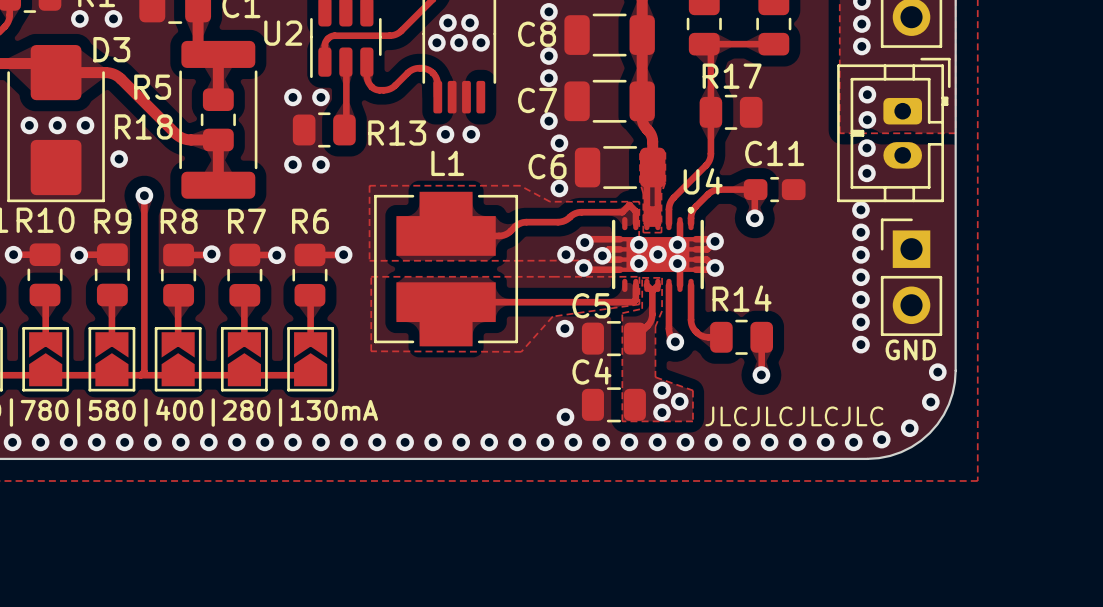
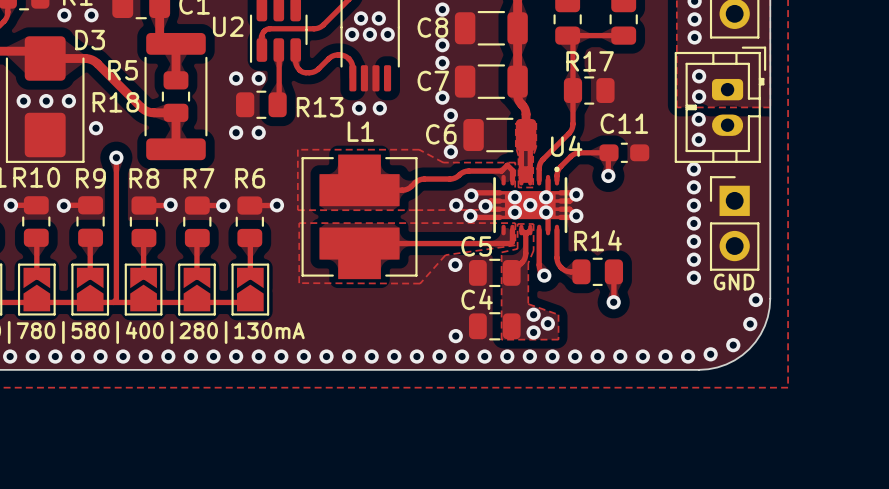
text: JLCJLCJLCJLC (794, 416) -> none

